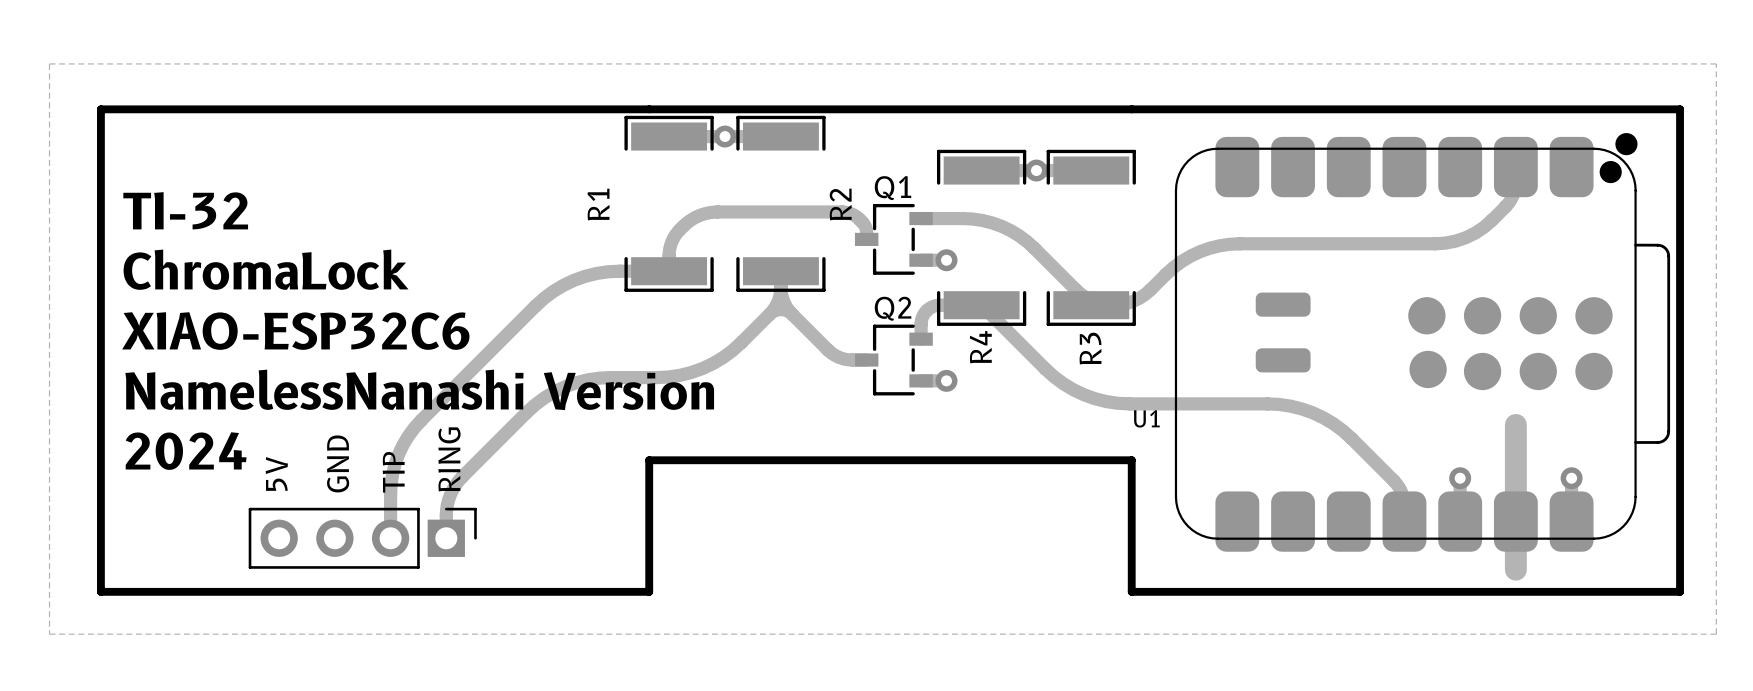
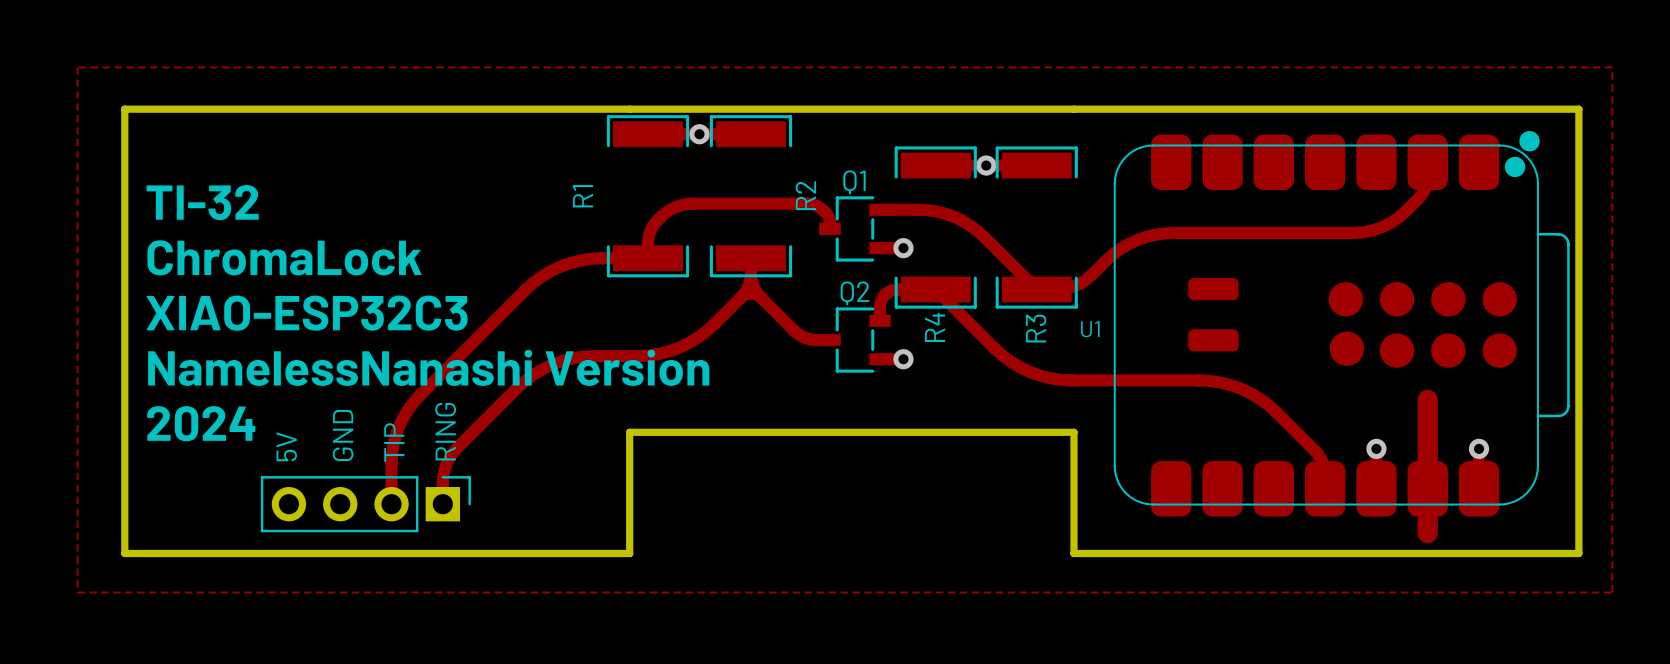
text: XIAO-ESP32C6 (295, 331) -> XIAO-ESP32C3 (307, 313)
U1 name position: U1 (1146, 418) -> U1 (1090, 329)

